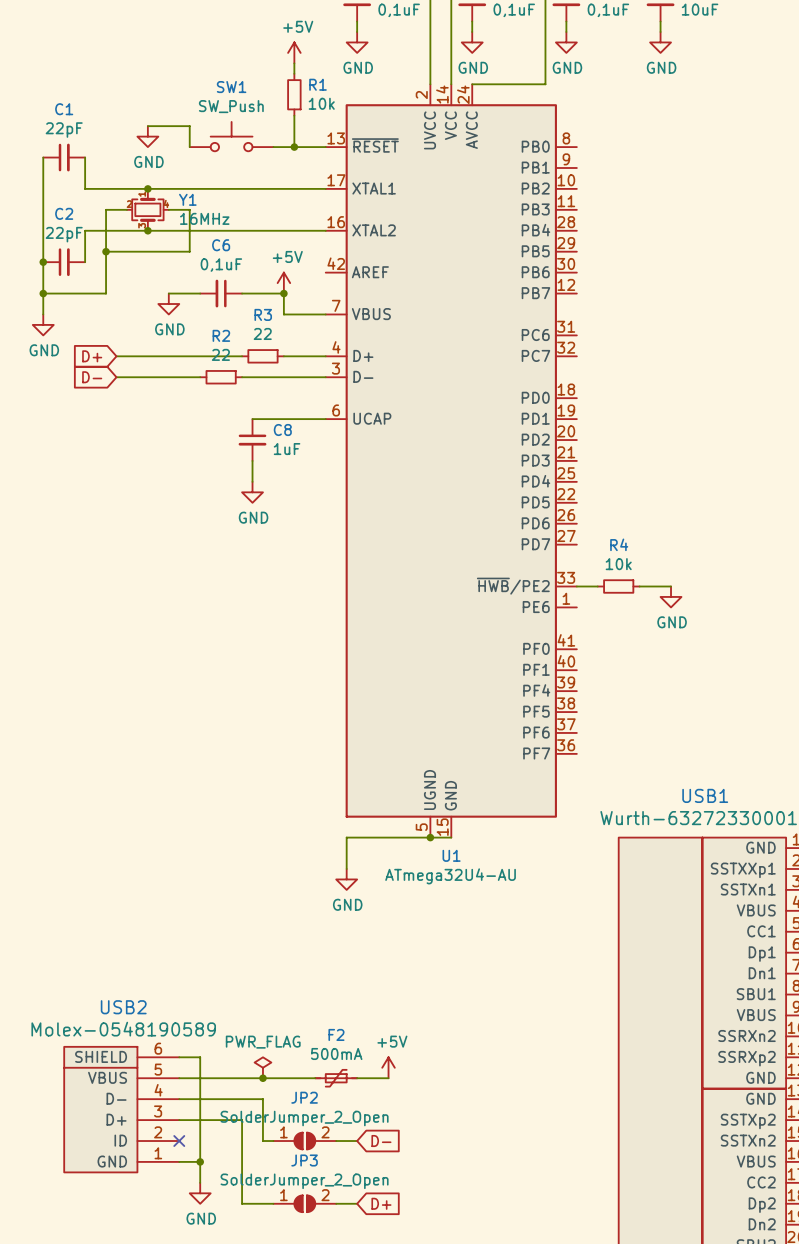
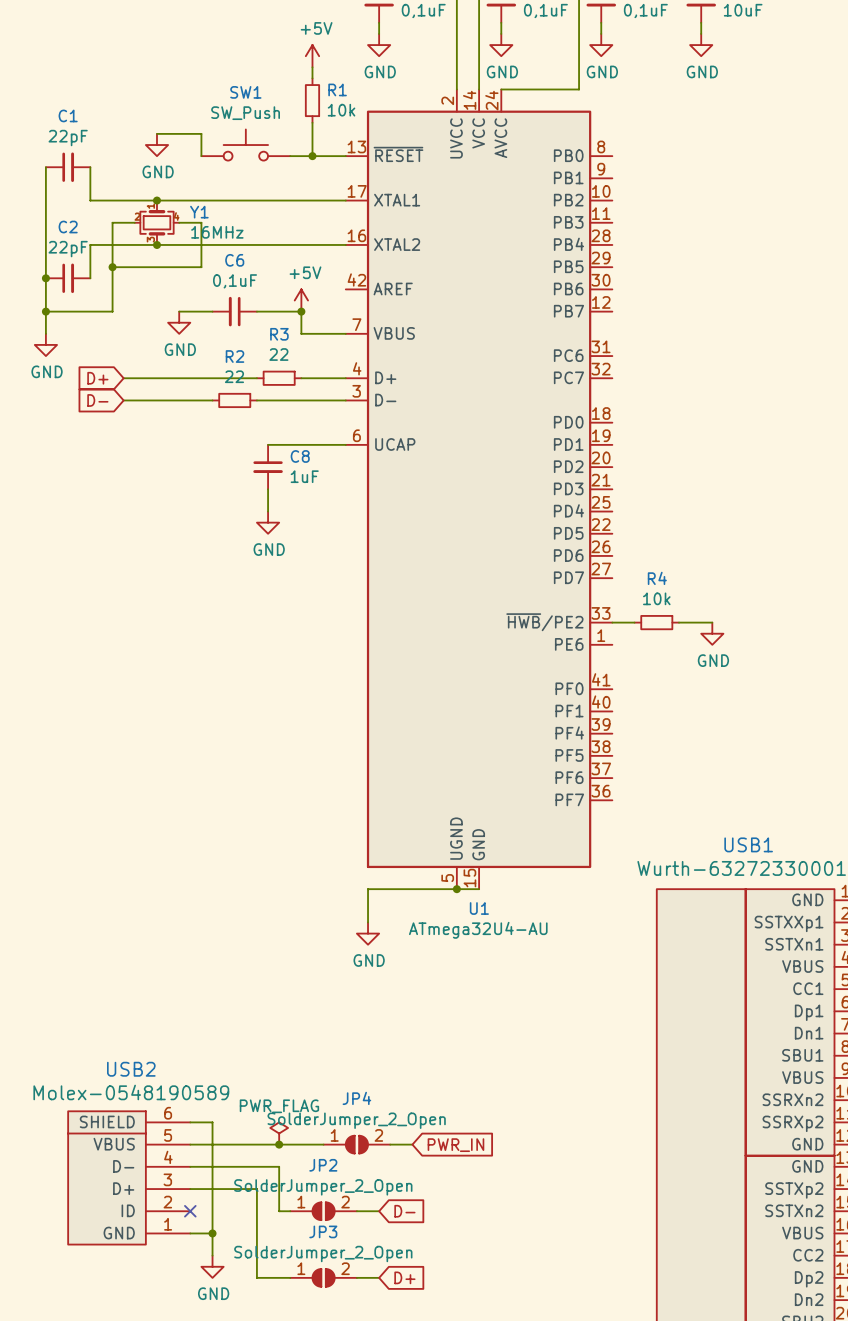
power symbol: +5V (388, 1067) -> none
F2: 500mA (336, 1078) -> none
JP4: none -> SolderJumper_2_Open (356, 1144)
global label: none -> PWR_IN (455, 1145)

